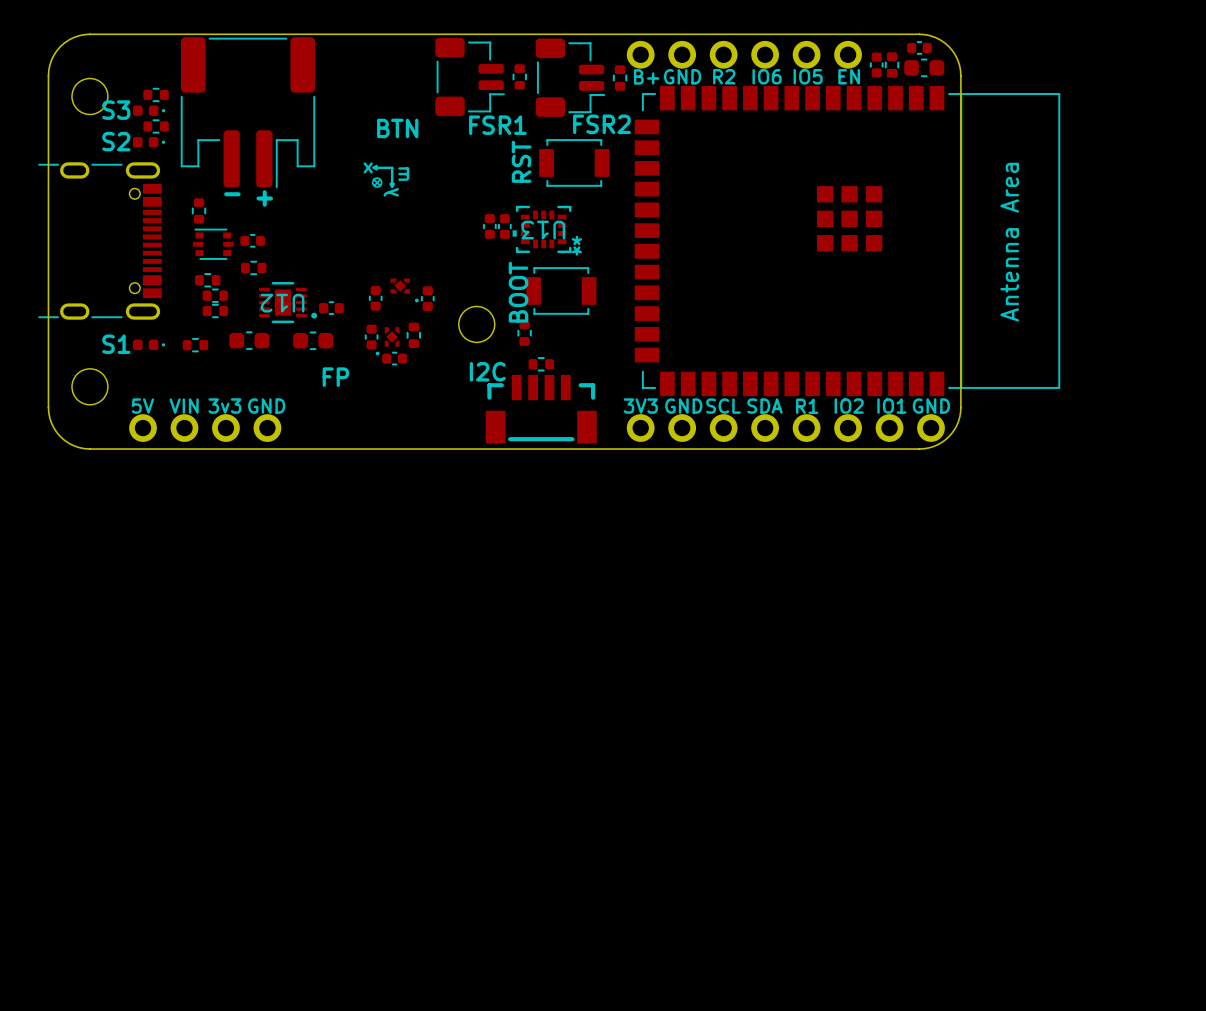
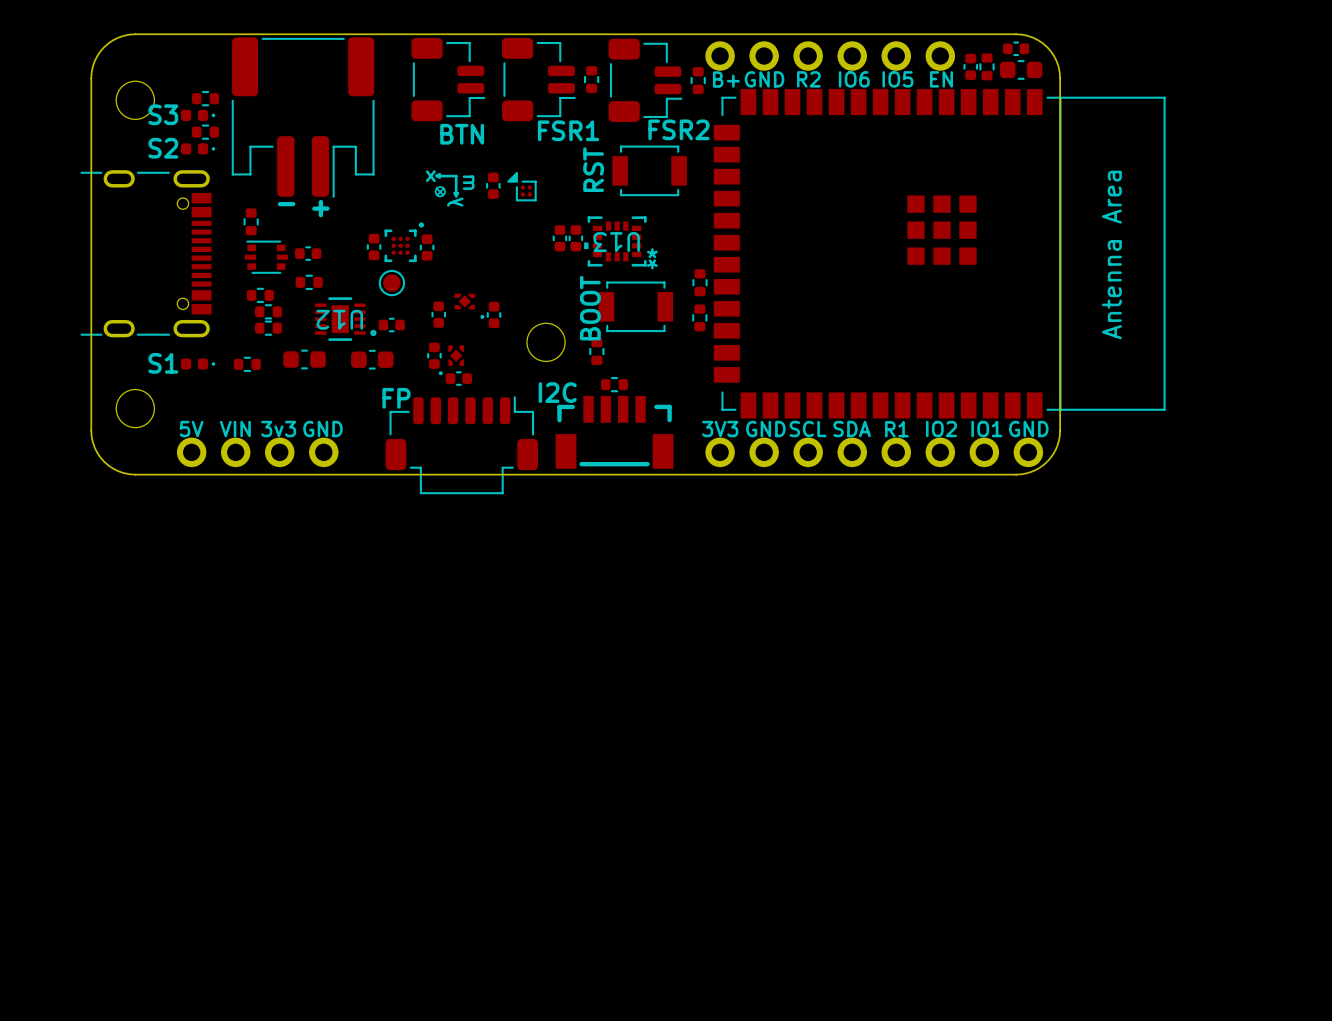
part: none -> (448, 79)
part: none -> (493, 185)
part: none -> (521, 186)
part: none -> (404, 242)
part: none -> (374, 246)
part: none -> (427, 247)
part: none -> (391, 283)
part: none -> (700, 282)
part: none -> (699, 317)
part: (413, 335) -> none
part: none -> (461, 445)

